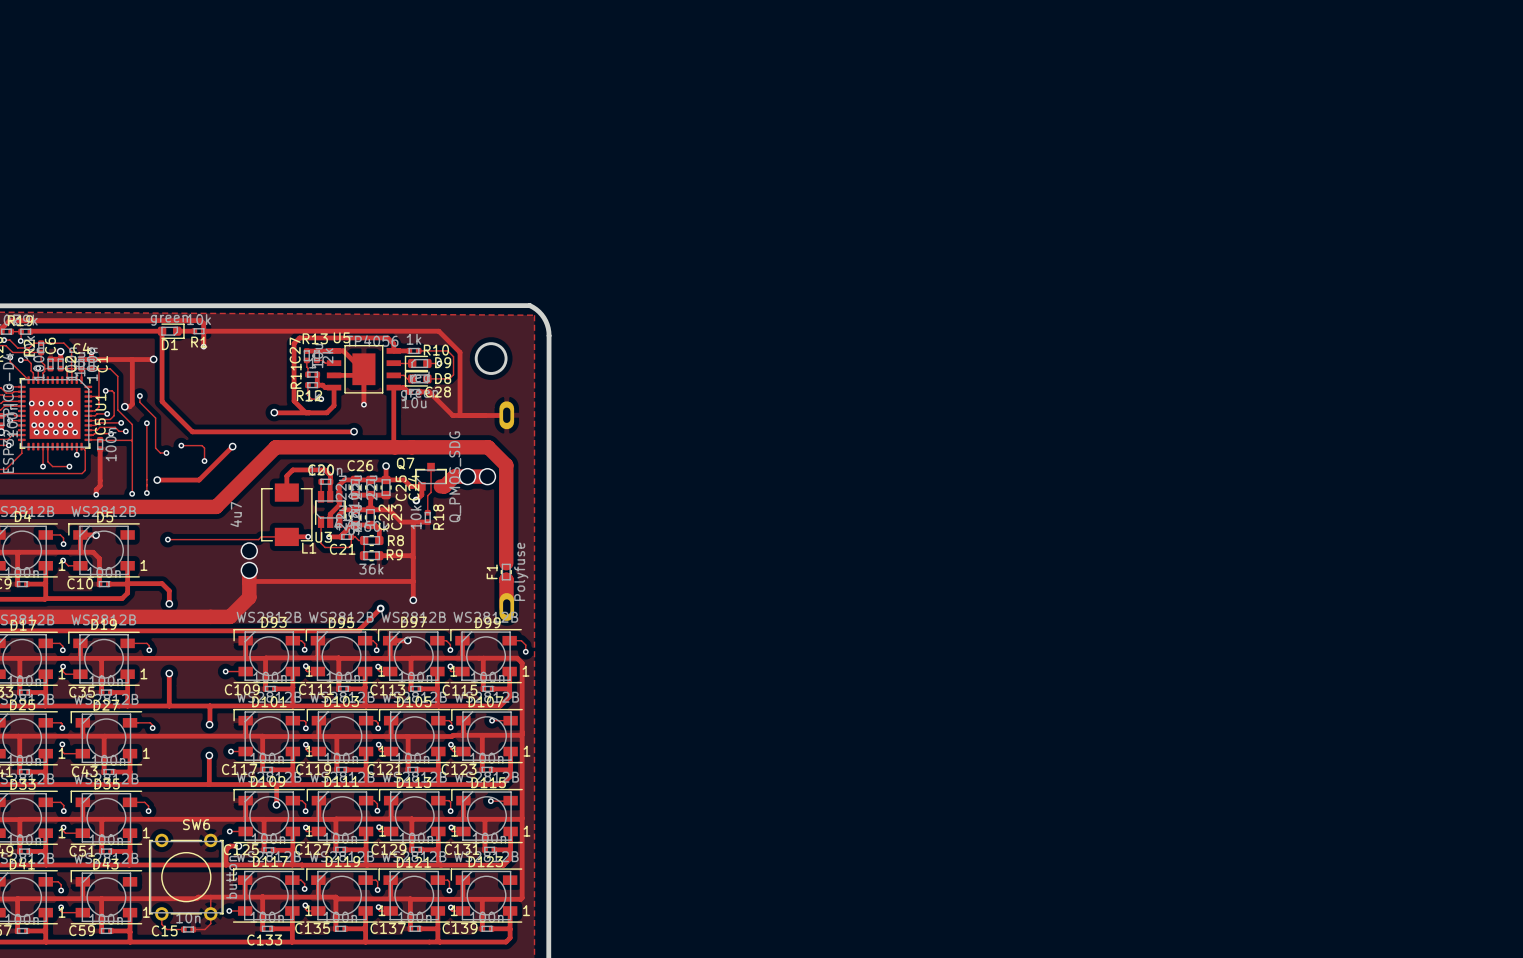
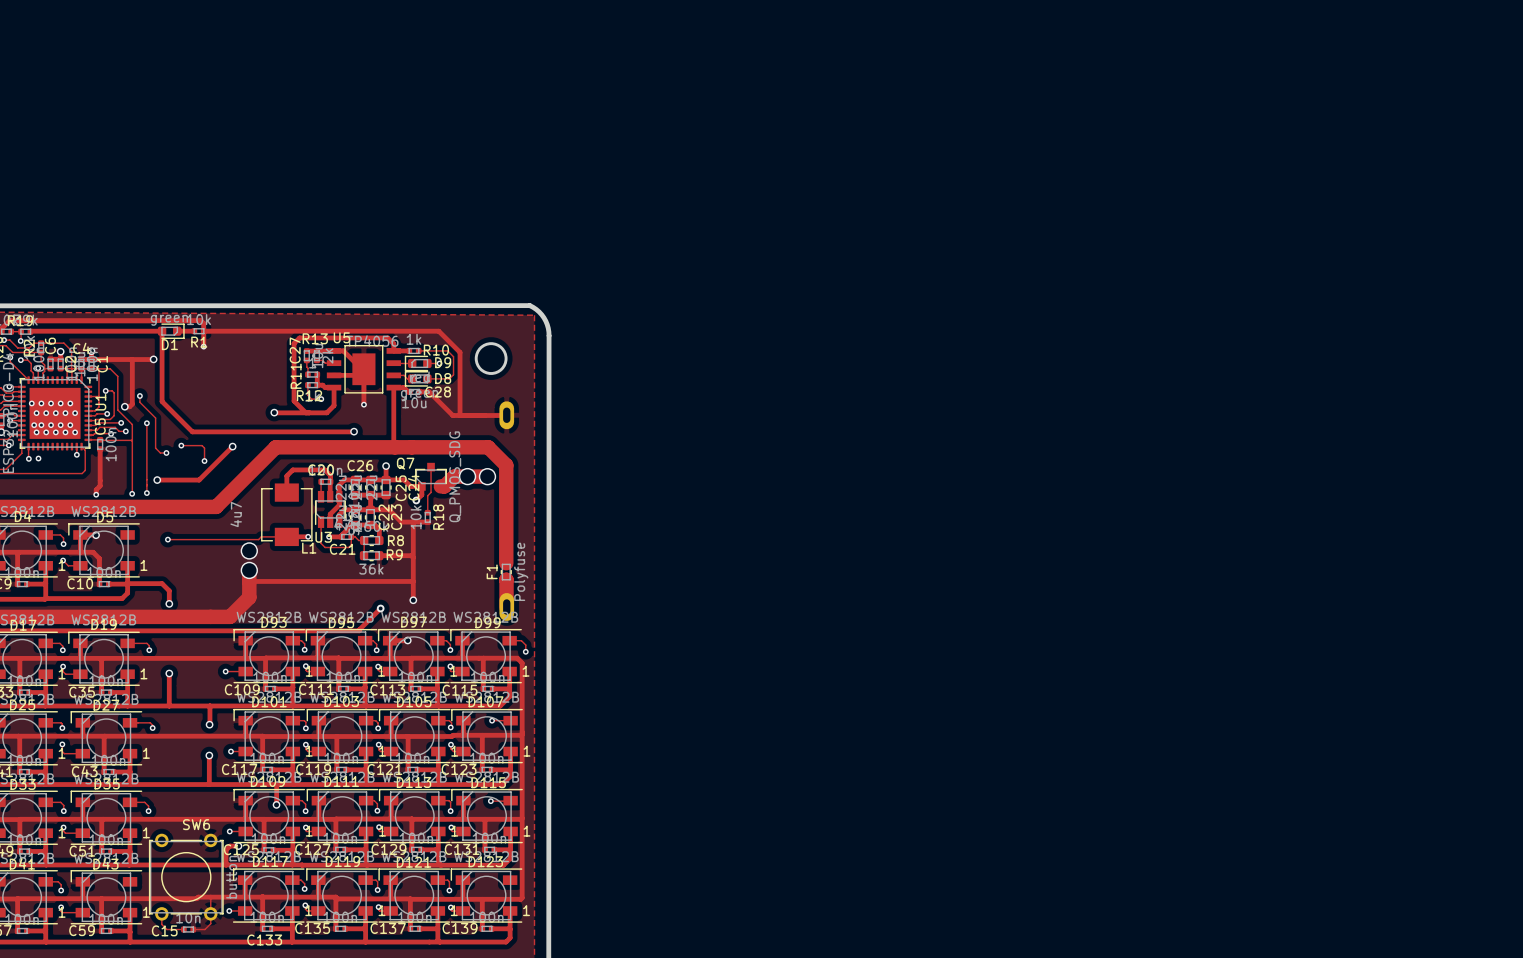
track: none -> (28, 446) (28, 458)
track: (43, 446) (43, 466) -> none
track: (47, 446) (47, 461) (52, 466) (69, 466) -> none
via: none -> (28, 458)
via: none -> (38, 458)
via: (43, 466) -> none
via: (69, 466) -> none

